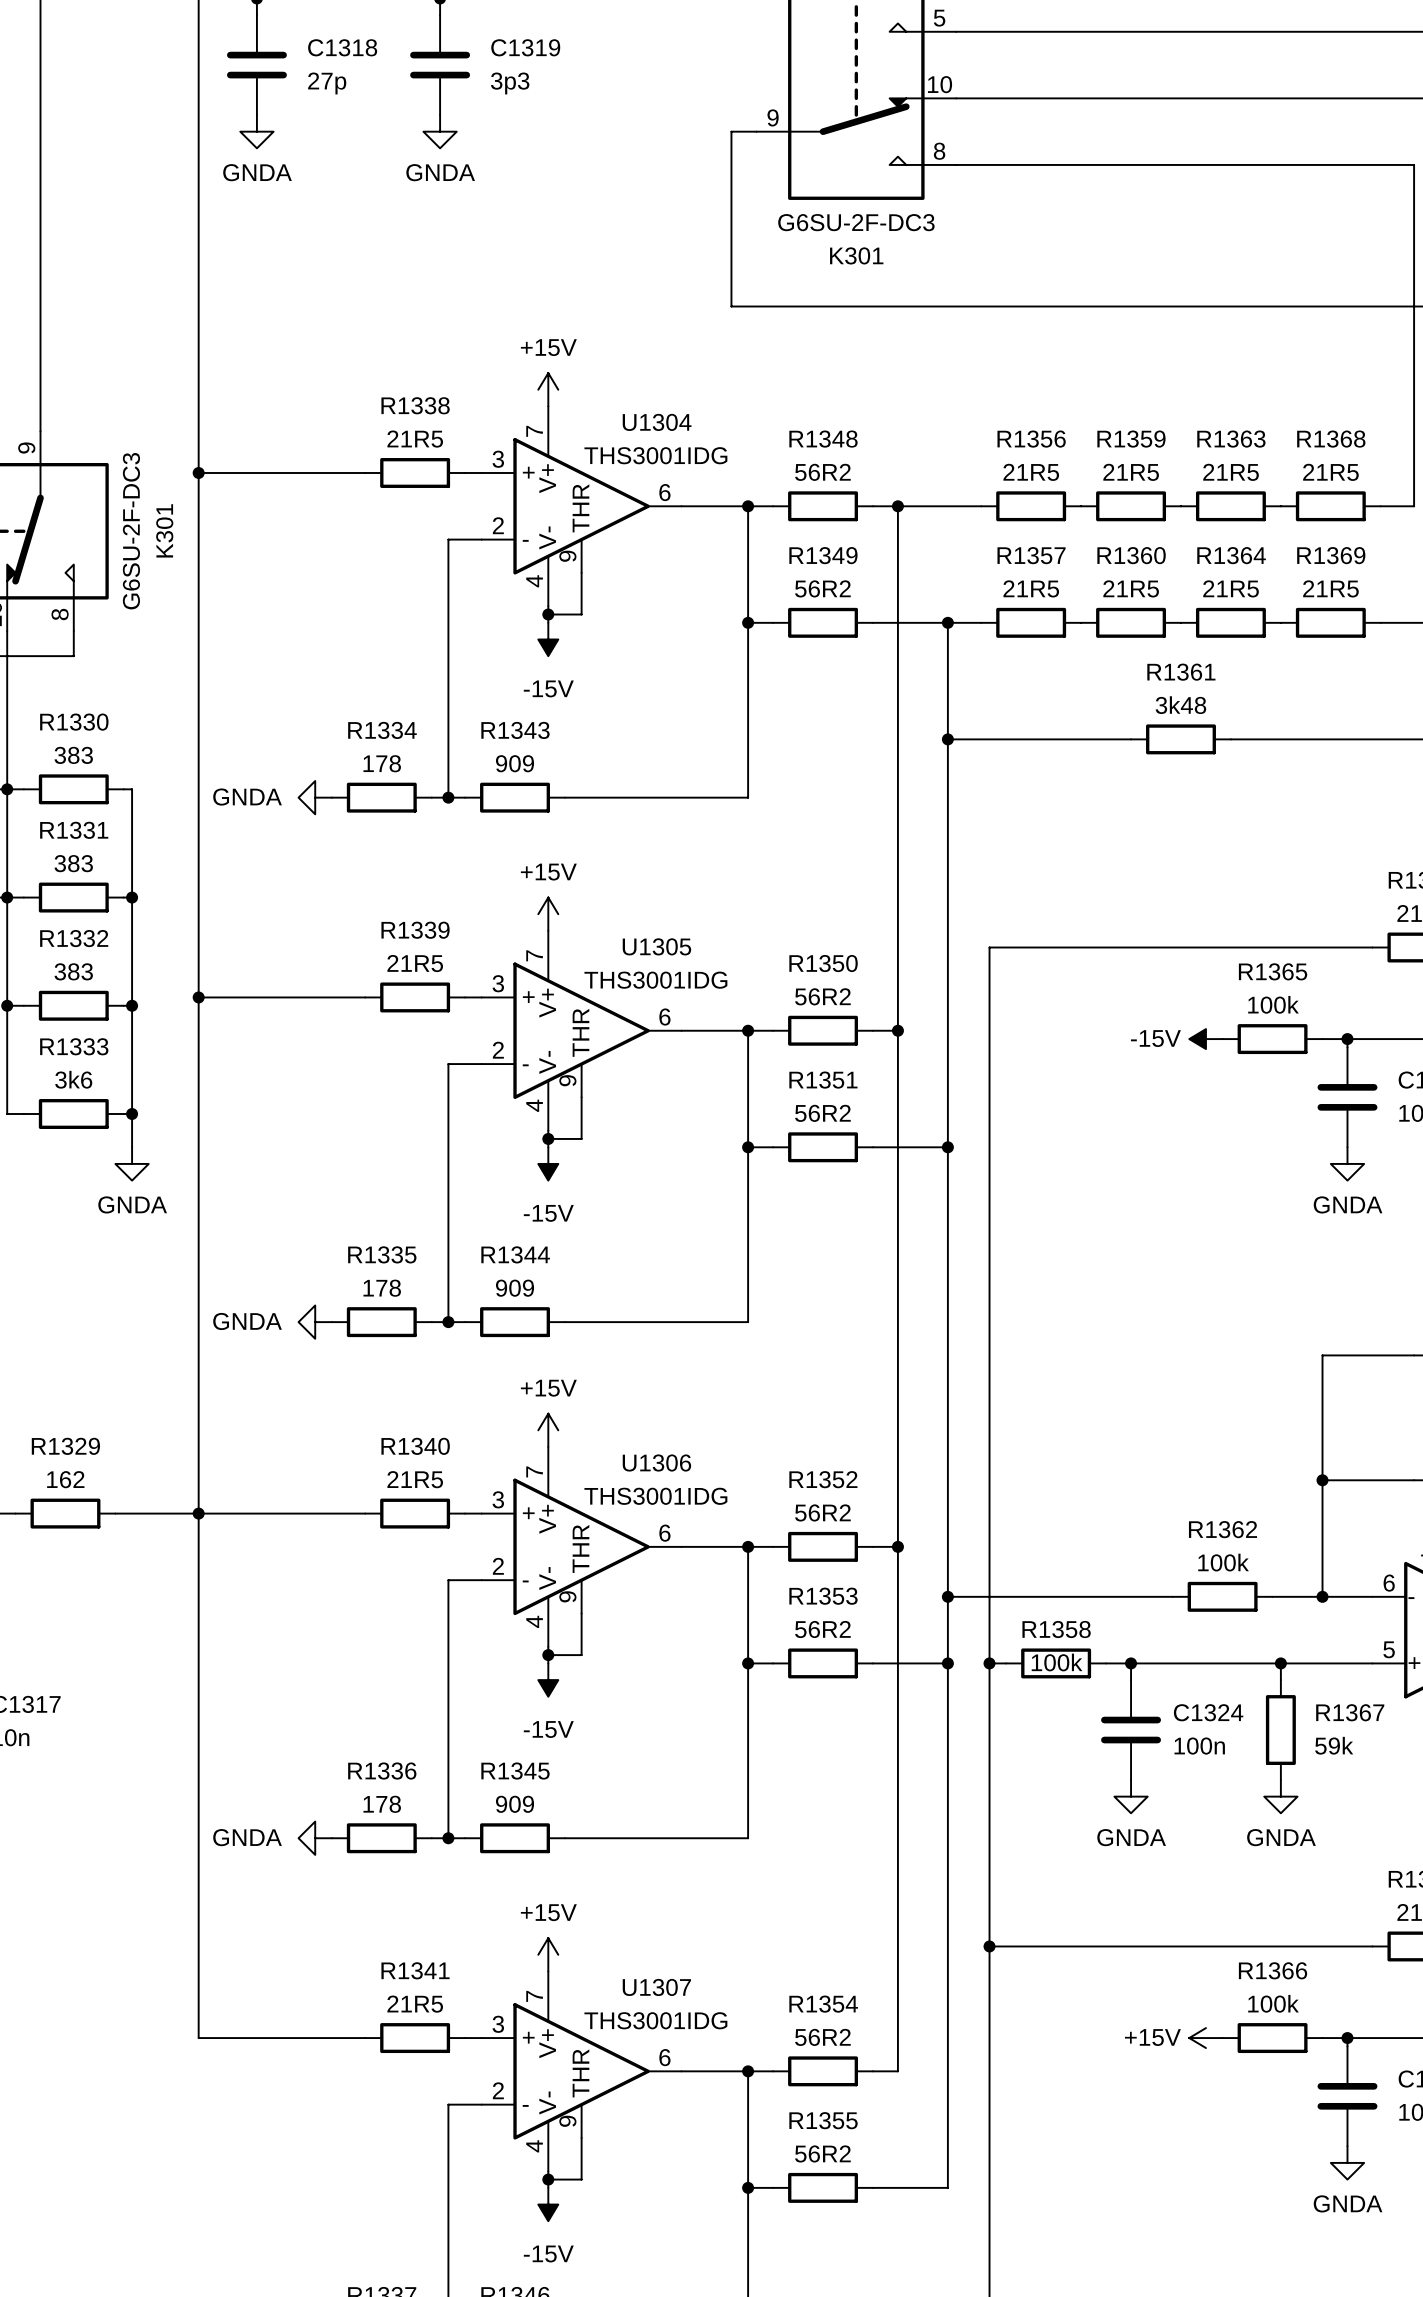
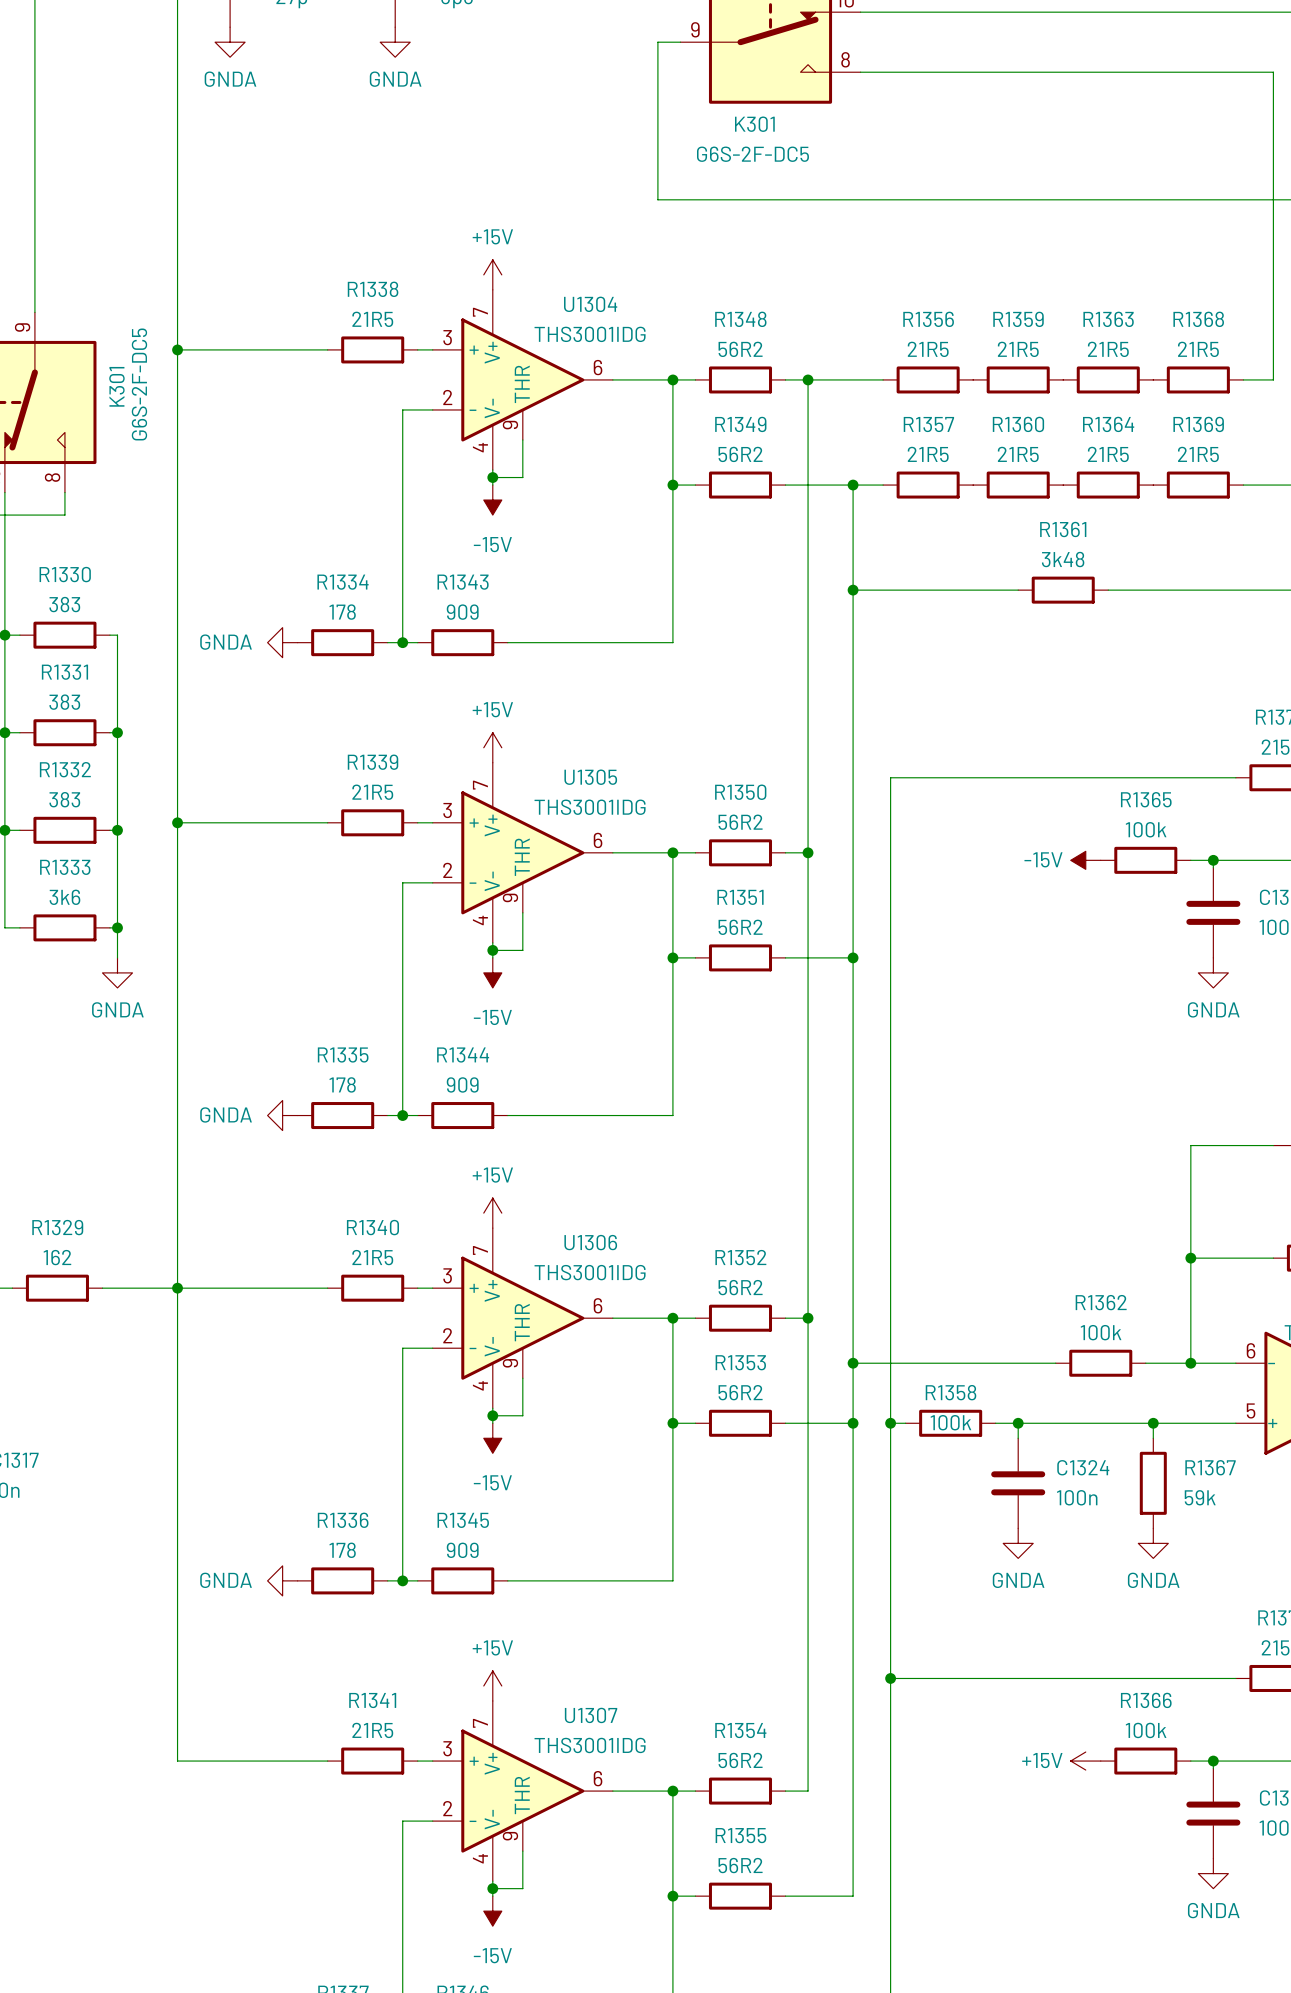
K301 value: G6SU-2F-DC3 (856, 222) -> G6S-2F-DC5 (752, 154)
K301 name position: K301 (856, 255) -> K301 (754, 124)
K301 name position: K301 (164, 530) -> K301 (116, 386)
K301 value: G6SU-2F-DC3 (131, 531) -> G6S-2F-DC5 (139, 384)

